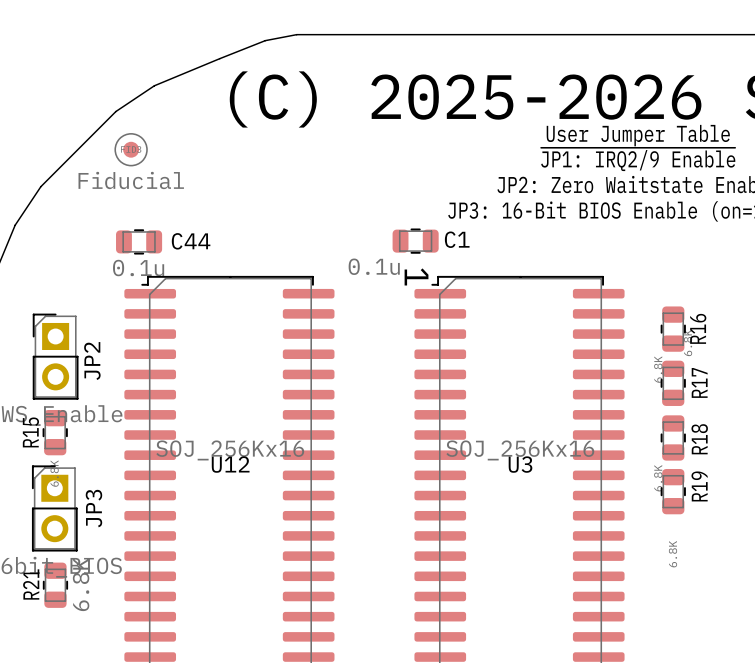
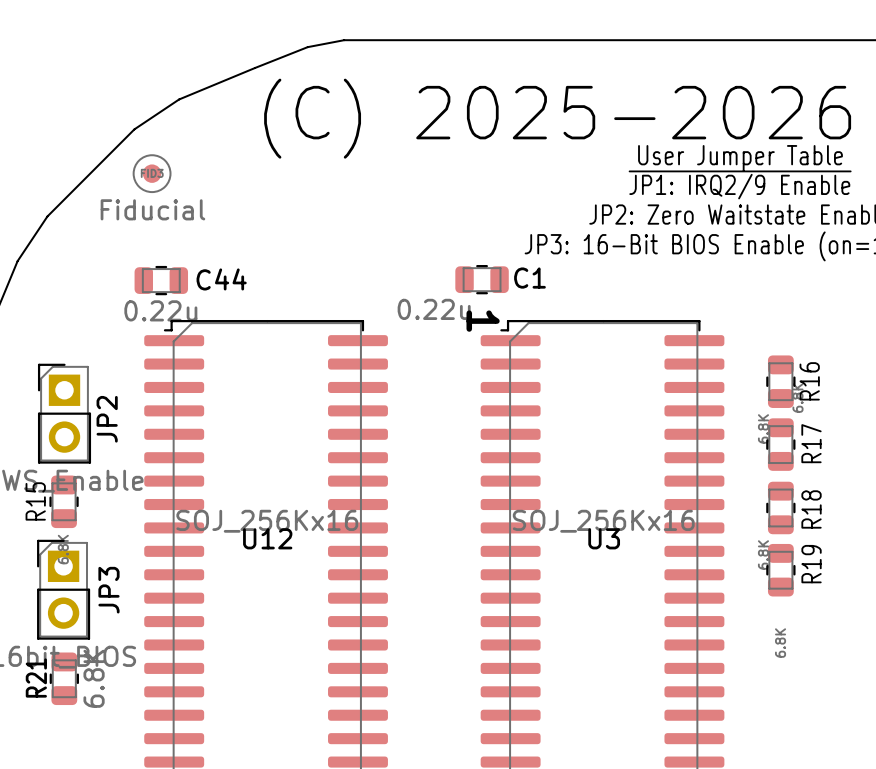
C1 value: 0.1u (374, 266) -> 0.22u (434, 309)
C44 value: 0.1u (138, 268) -> 0.22u (160, 310)

